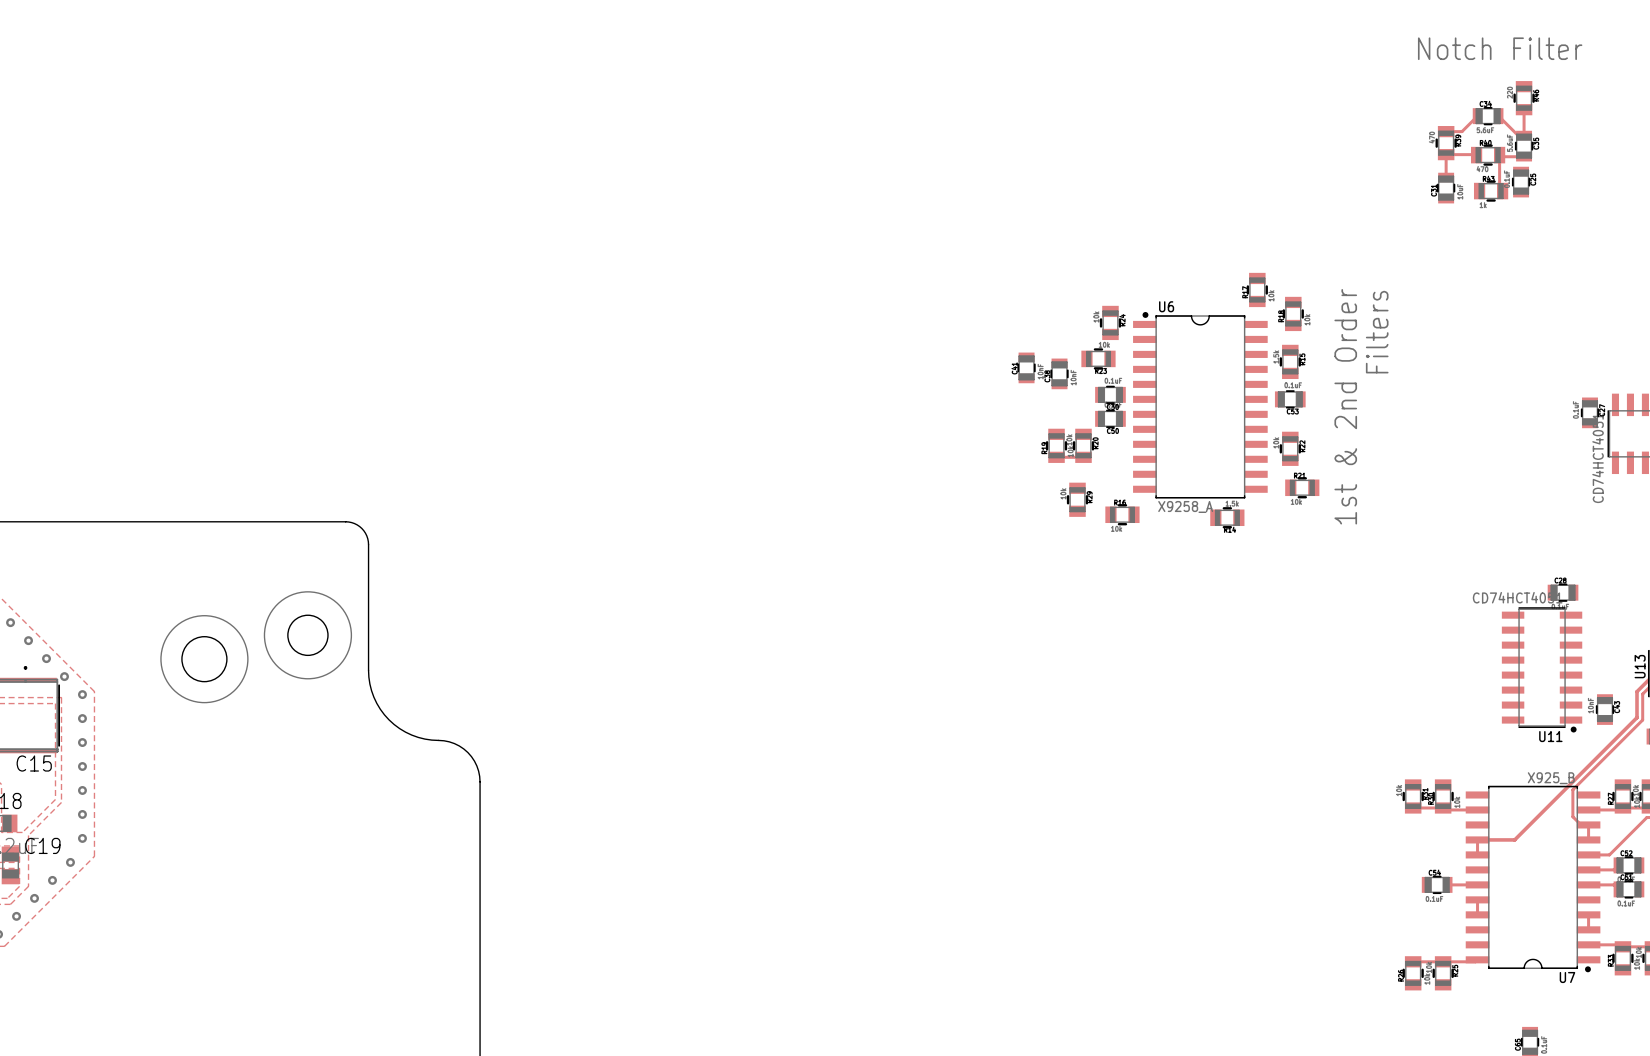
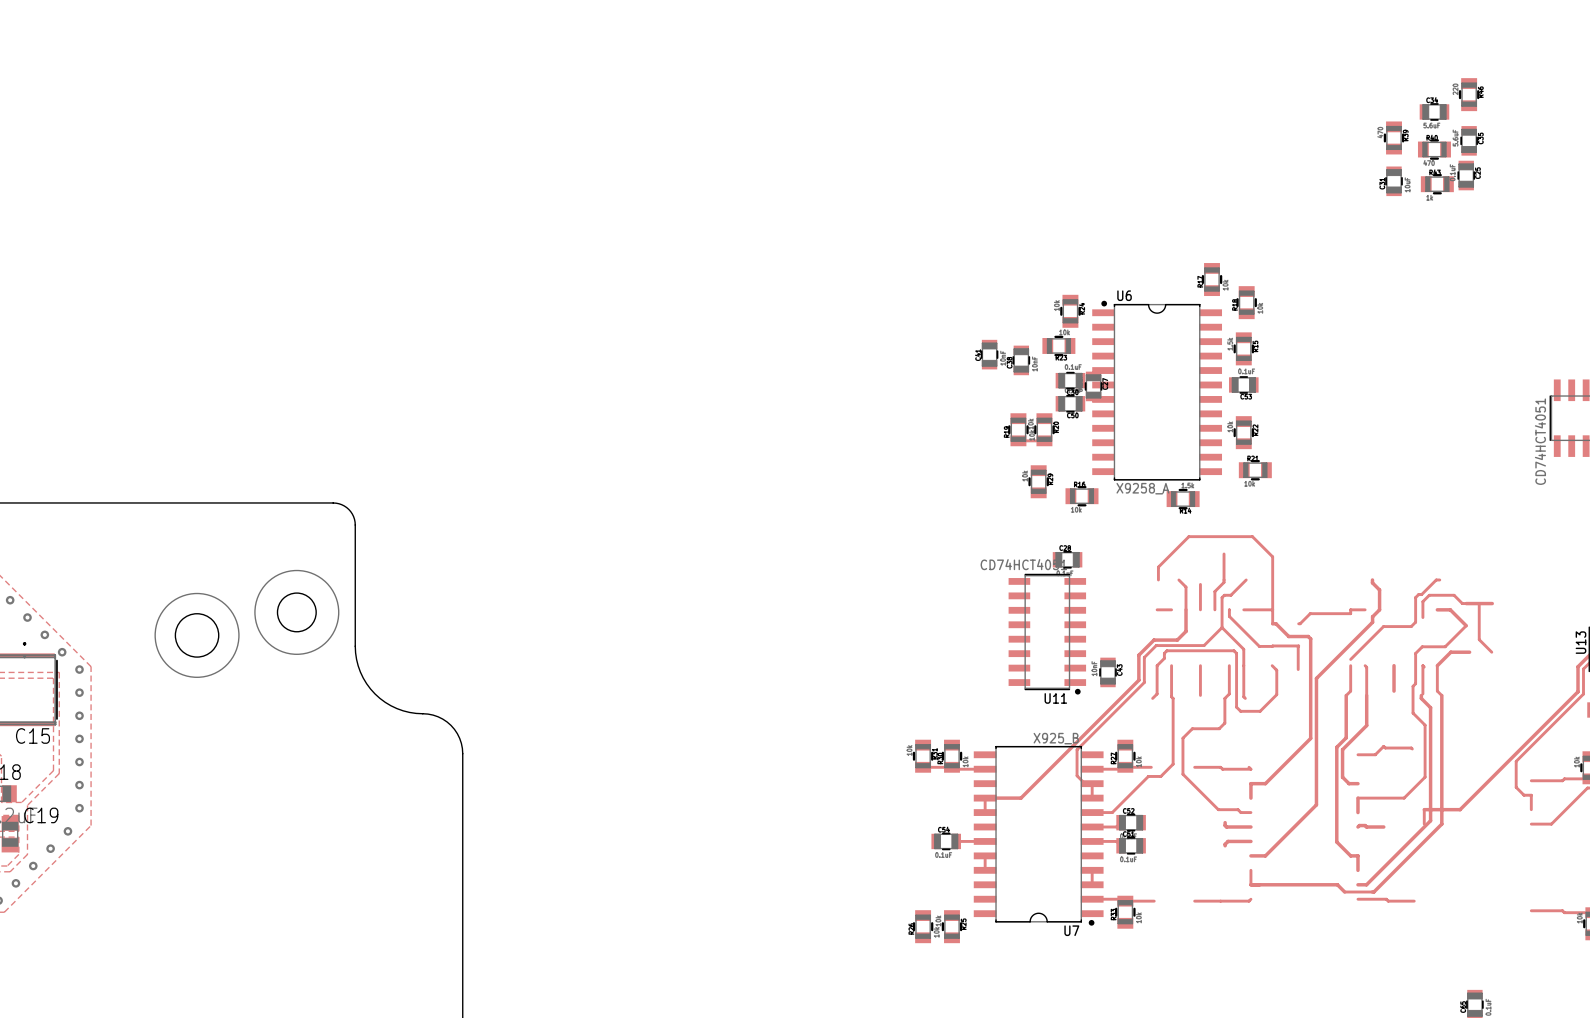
text: Notch Filter (1500, 48) -> none
track: (1524, 109) (1524, 135) (1518, 135) (1498, 116) -> none
track: (1477, 116) (1462, 131) (1446, 131) -> none
track: (1476, 155) (1446, 154) (1446, 177) -> none
track: (1524, 156) (1501, 156) (1499, 155) (1499, 188) (1502, 191) -> none
text: Filters (1377, 332) -> none
text: 1st & 2nd Order (1345, 406) -> none
part position: (1590, 412) -> (1093, 386)
track: none -> (1224, 553) (1224, 582) (1214, 591) (1214, 609)
part position: (1563, 592) -> (1067, 559)
track: none -> (1158, 579) (1158, 567) (1188, 536) (1252, 536) (1272, 556) (1272, 623) (1276, 623) (1288, 636) (1308, 636) (1310, 638) (1310, 738) (1265, 783) (1250, 783) (1250, 798)
track: none -> (1178, 579) (1186, 587) (1186, 631) (1177, 640) (1153, 640) (1138, 655) (1138, 680) (1020, 798) (985, 798) (985, 812)
track: none -> (1246, 579) (1230, 595) (1224, 595) (1222, 597) (1222, 627)
track: none -> (1372, 579) (1372, 582) (1379, 589) (1379, 609) (1372, 616) (1372, 622) (1316, 678) (1316, 804) (1265, 855) (1250, 855)
track: none -> (1439, 579) (1436, 579) (1421, 594) (1415, 597) (1415, 622) (1411, 626) (1383, 626) (1350, 659)
track: none -> (1200, 584) (1200, 609)
track: none -> (1479, 603) (1479, 639) (1491, 652)
track: none -> (1492, 603) (1462, 603) (1454, 595) (1429, 595) (1422, 601) (1422, 617)
track: none -> (1157, 609) (1171, 609)
track: none -> (1229, 609) (1229, 616) (1259, 646) (1298, 645) (1298, 669)
track: none -> (1243, 609) (1272, 609)
track: none -> (1365, 609) (1350, 609) (1350, 613) (1310, 613) (1298, 623)
track: none -> (1437, 609) (1450, 609) (1466, 625) (1445, 646) (1422, 646) (1415, 653) (1413, 713) (1425, 725) (1425, 777) (1404, 798) (1357, 798) (1357, 812)
track: none -> (1222, 627) (1243, 649) (1243, 696) (1245, 698)
track: none -> (1222, 627) (1204, 645) (1156, 645) (1144, 657) (1144, 682) (1077, 749) (1077, 775) (1084, 783) (1092, 783) (1092, 798)
U11 position: (1542, 669) -> (1047, 634)
track: none -> (1469, 652) (1450, 652) (1437, 665) (1437, 691) (1441, 695) (1441, 824) (1373, 892) (1344, 892) (1337, 884) (1250, 884) (1250, 870)
track: none -> (1171, 665) (1173, 764) (1160, 776) (1148, 776) (1112, 812) (1092, 812)
track: none -> (1200, 665) (1200, 695)
track: none -> (1229, 665) (1229, 693) (1224, 698) (1224, 723) (1219, 728) (1192, 728) (1182, 738) (1182, 774) (1218, 809) (1238, 809) (1240, 812) (1250, 812)
track: none -> (1272, 665) (1276, 670) (1276, 694) (1260, 711) (1240, 711) (1236, 707) (1236, 653) (1233, 650) (1166, 650) (1164, 653) (1164, 658) (1157, 665) (1157, 693) (1152, 698)
track: none -> (1350, 665) (1350, 691) (1346, 695) (1346, 737) (1336, 747) (1336, 841) (1350, 855) (1357, 855) (1357, 870)
track: none -> (1365, 665) (1366, 667) (1366, 725) (1342, 749) (1342, 777) (1349, 783) (1357, 783)
track: none -> (1394, 665) (1394, 691)
track: none -> (1424, 667) (1422, 665) (1422, 693)
part position: (1604, 709) -> (1108, 672)
track: none -> (1421, 695) (1421, 698) (1430, 707) (1430, 820) (1366, 884) (1357, 884)
track: none -> (1412, 748) (1383, 746) (1375, 754) (1357, 754)
track: none -> (923, 767) (985, 769)
track: none -> (1151, 767) (1092, 769)
track: none -> (1194, 767) (1250, 769) (1249, 767)
part position: (1413, 796) -> (923, 756)
part position: (1443, 796) -> (951, 756)
part position: (1622, 796) -> (1125, 756)
track: (1413, 807) (1477, 809) -> none
track: none -> (1120, 822) (1116, 827) (1092, 827)
track: none -> (1225, 822) (1226, 827) (1250, 827)
track: none -> (1357, 827) (1383, 827)
track: (1618, 865) (1613, 869) (1588, 869) -> none
part position: (1628, 865) -> (1131, 822)
track: none -> (956, 841) (985, 841)
track: none -> (1092, 841) (1116, 841) (1120, 845)
track: none -> (1250, 841) (1228, 841) (1225, 845)
U7 position: (1533, 879) -> (1038, 835)
part position: (1437, 884) -> (946, 841)
track: (1447, 884) (1477, 884) -> none
track: (1588, 884) (1613, 884) (1618, 889) -> none
track: none -> (985, 855) (985, 870)
part position: (1628, 889) -> (1131, 845)
track: (1477, 899) (1477, 914) -> none
track: none -> (1092, 870) (1092, 884)
track: (1588, 914) (1588, 929) -> none
track: none -> (1092, 899) (1154, 901)
track: none -> (1250, 899) (1249, 901) (1194, 901)
track: none -> (1357, 899) (1414, 901)
part position: (1622, 958) -> (1125, 912)
track: (1477, 959) (1475, 961) (1413, 961) -> none
part position: (1413, 973) -> (923, 926)
part position: (1443, 973) -> (951, 926)

